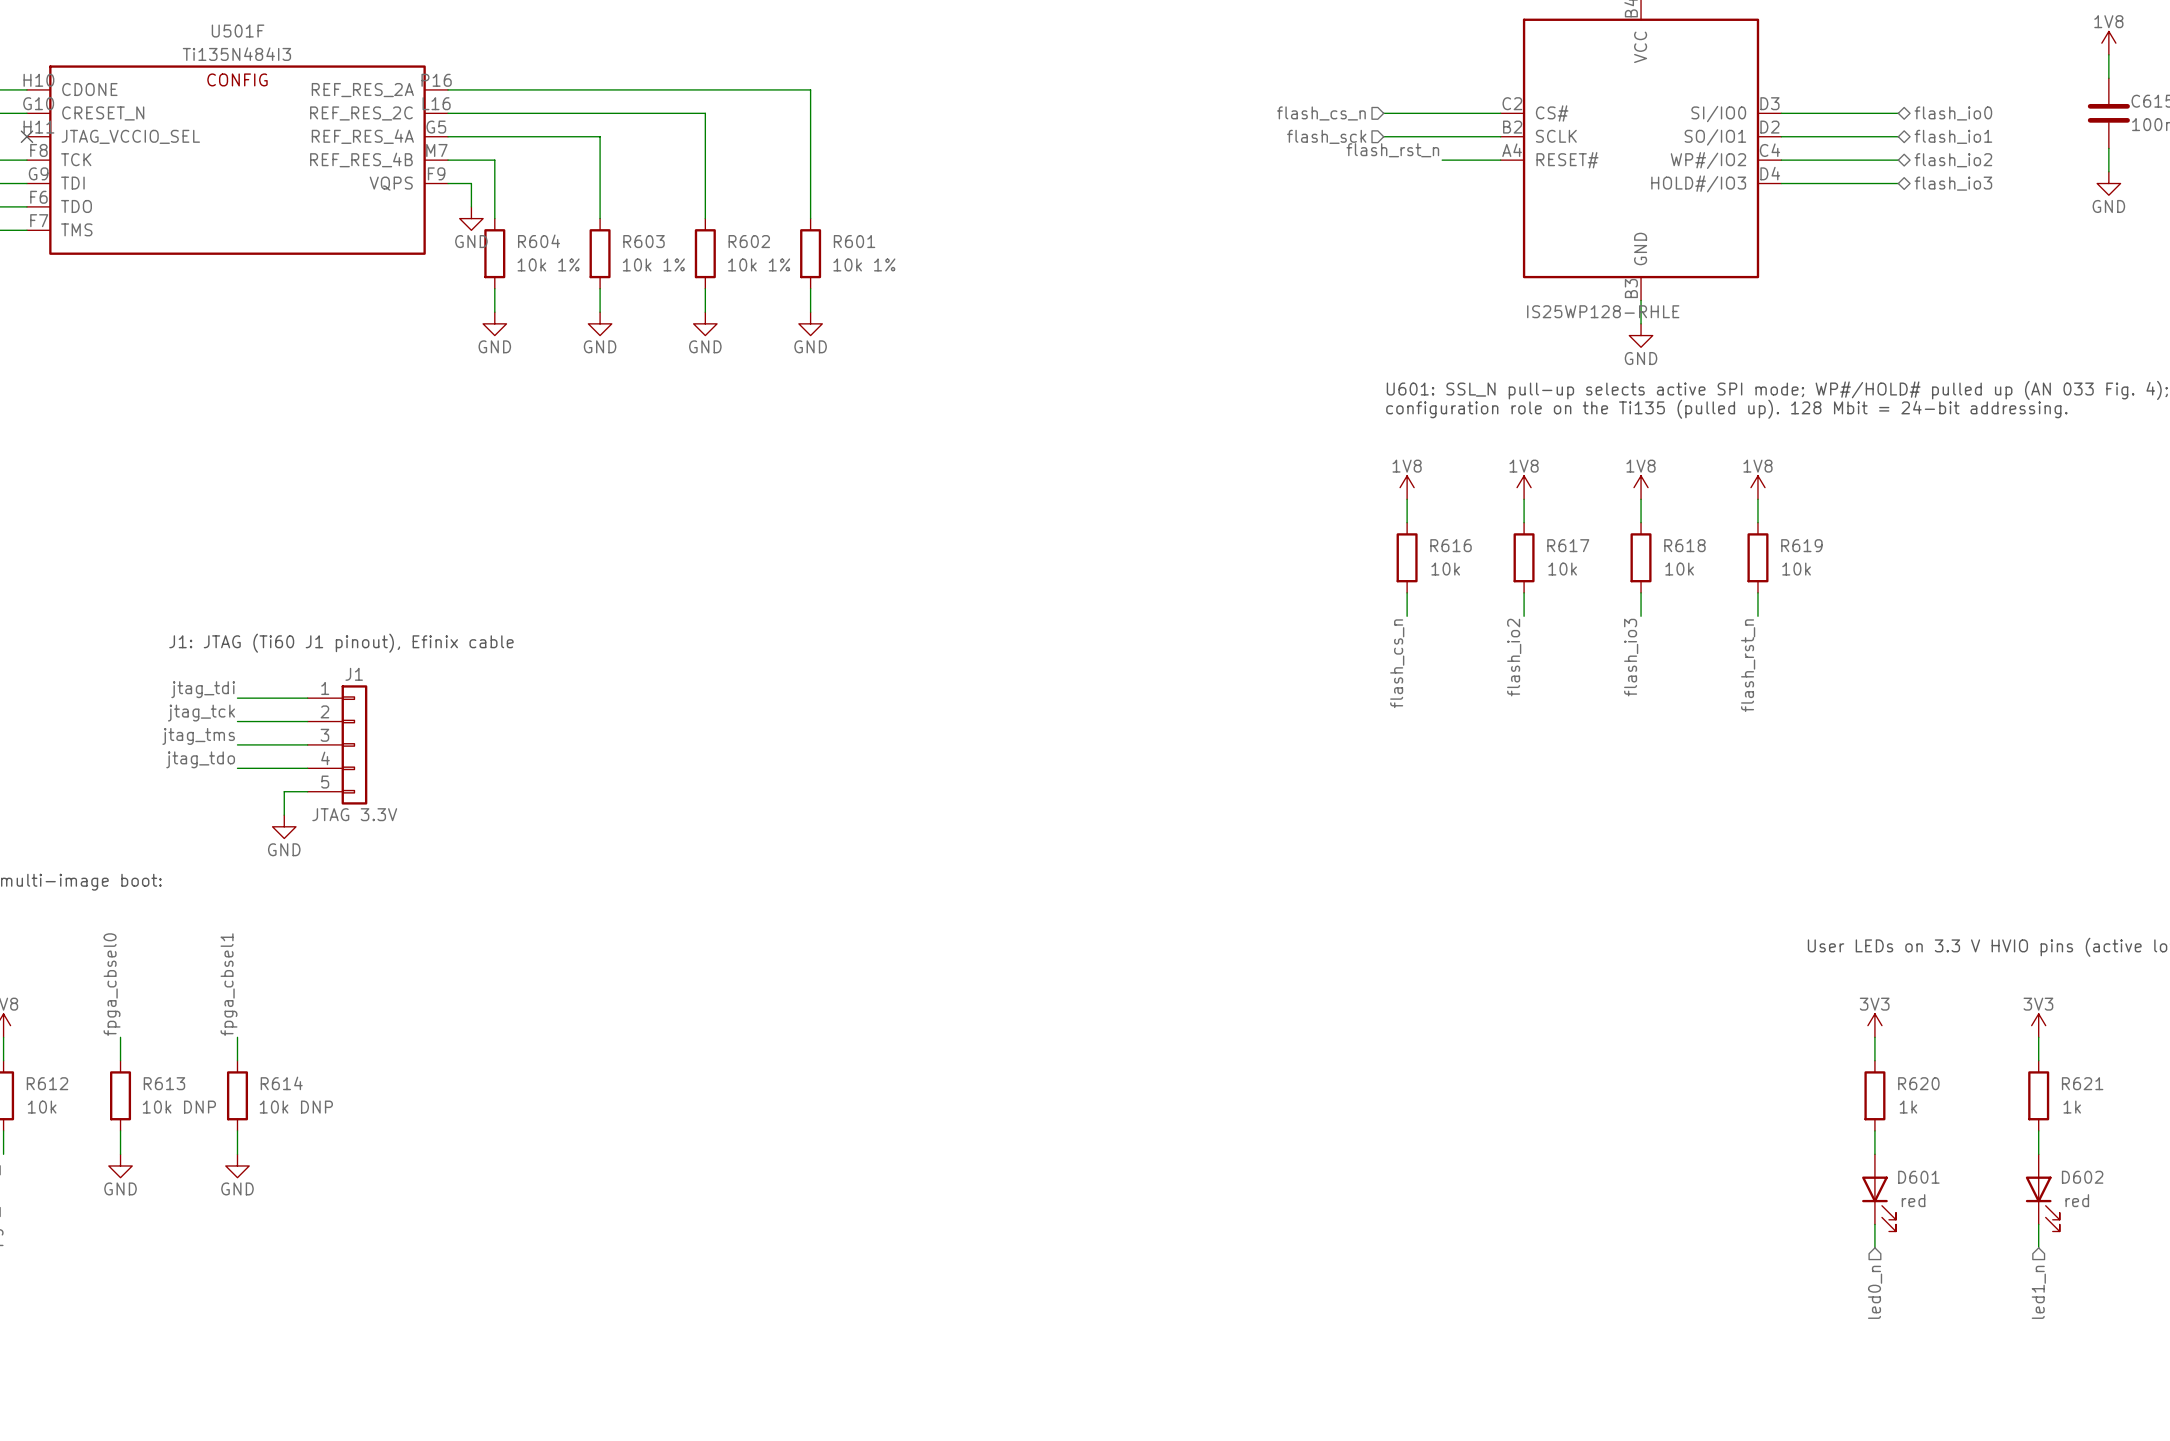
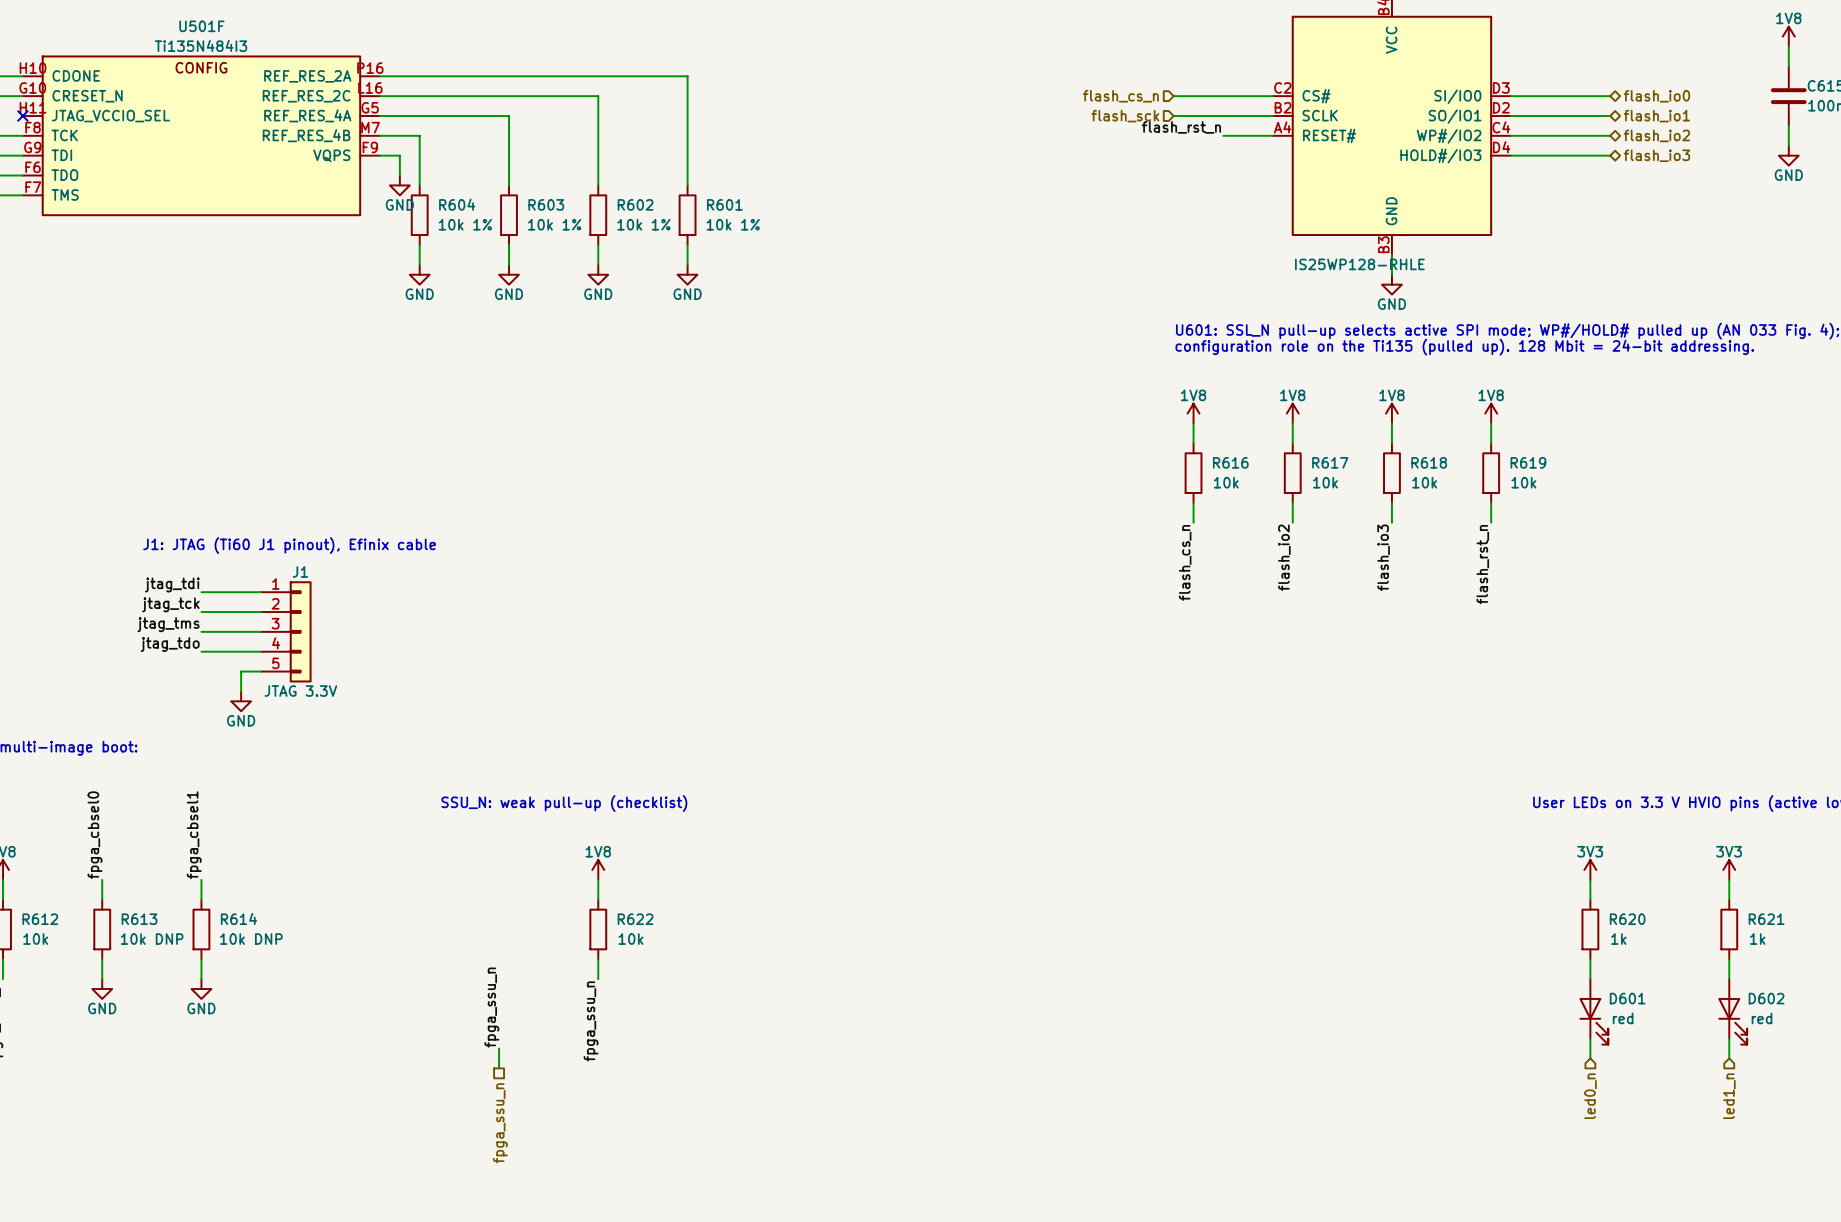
text: none -> SSU_N: weak pull-up (checklist) (564, 803)
power symbol: none -> 1V8 (598, 869)
wire: none -> (598, 879) (598, 899)
R622: none -> 10k (598, 929)
wire: none -> (598, 959) (598, 979)
label: none -> fpga_ssu_n (491, 1007)
label: none -> fpga_ssu_n (591, 1021)
wire: none -> (499, 1048) (499, 1068)
hierarchical label: none -> fpga_ssu_n (500, 1123)

